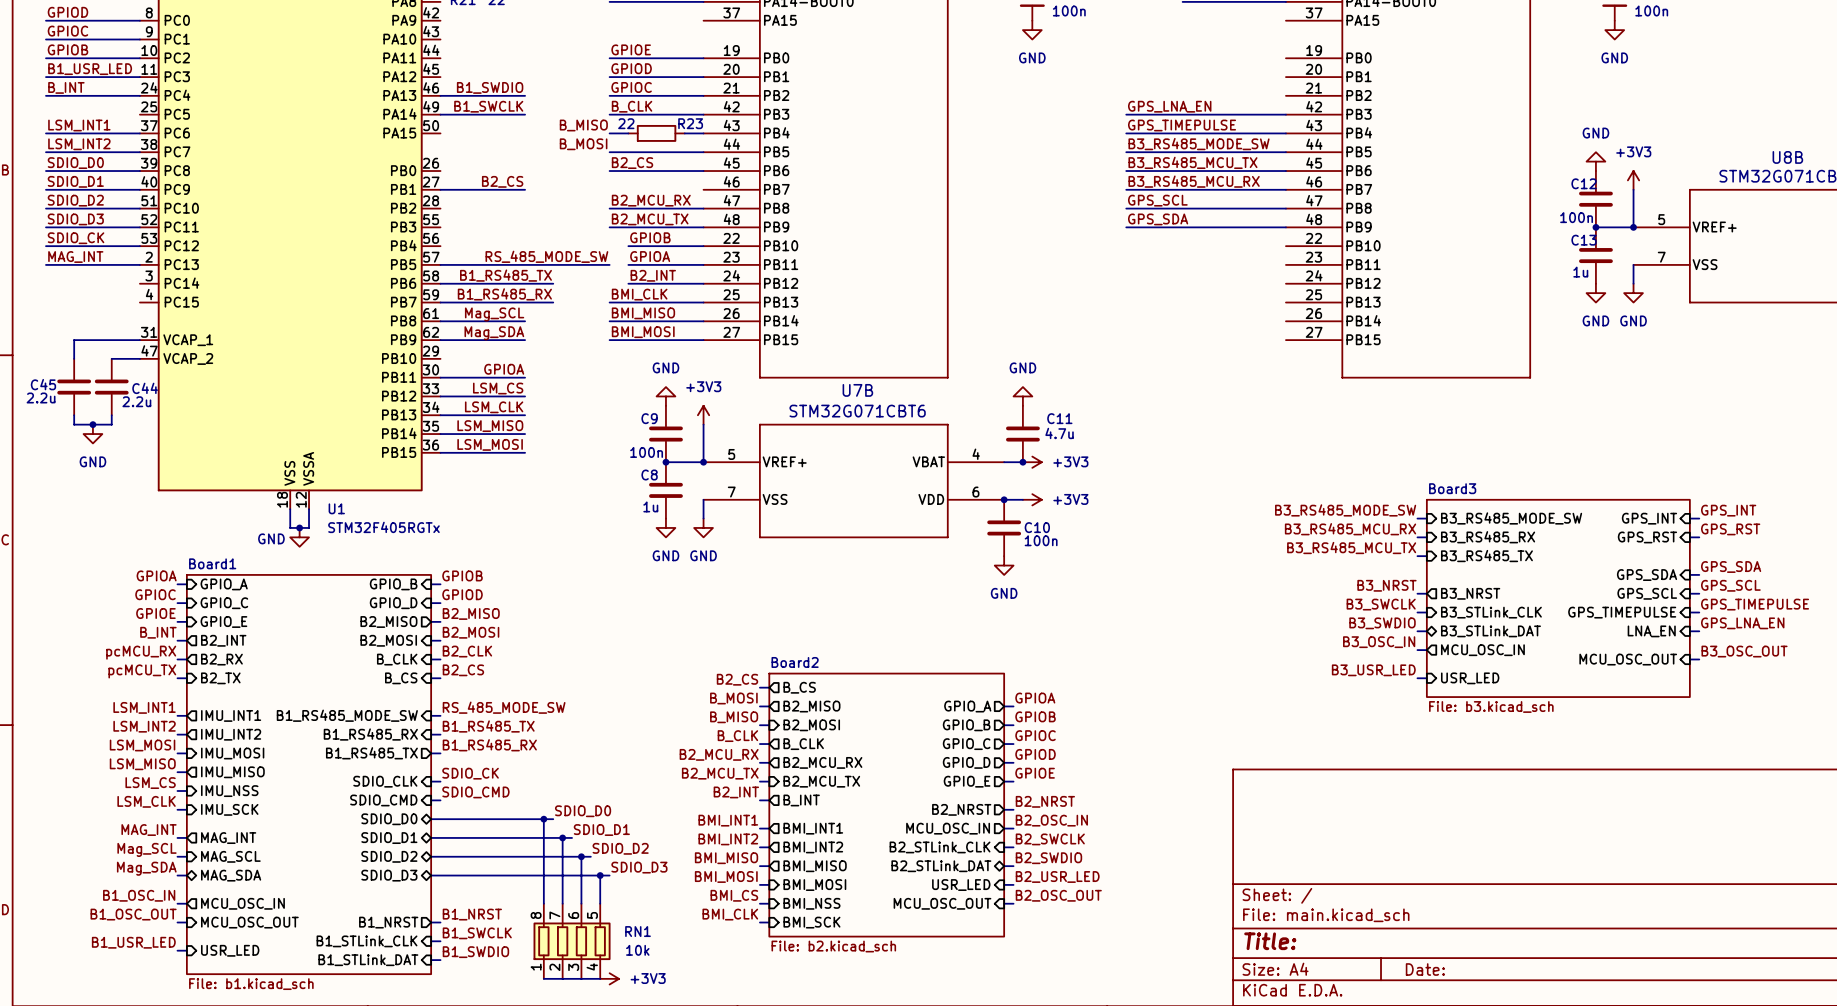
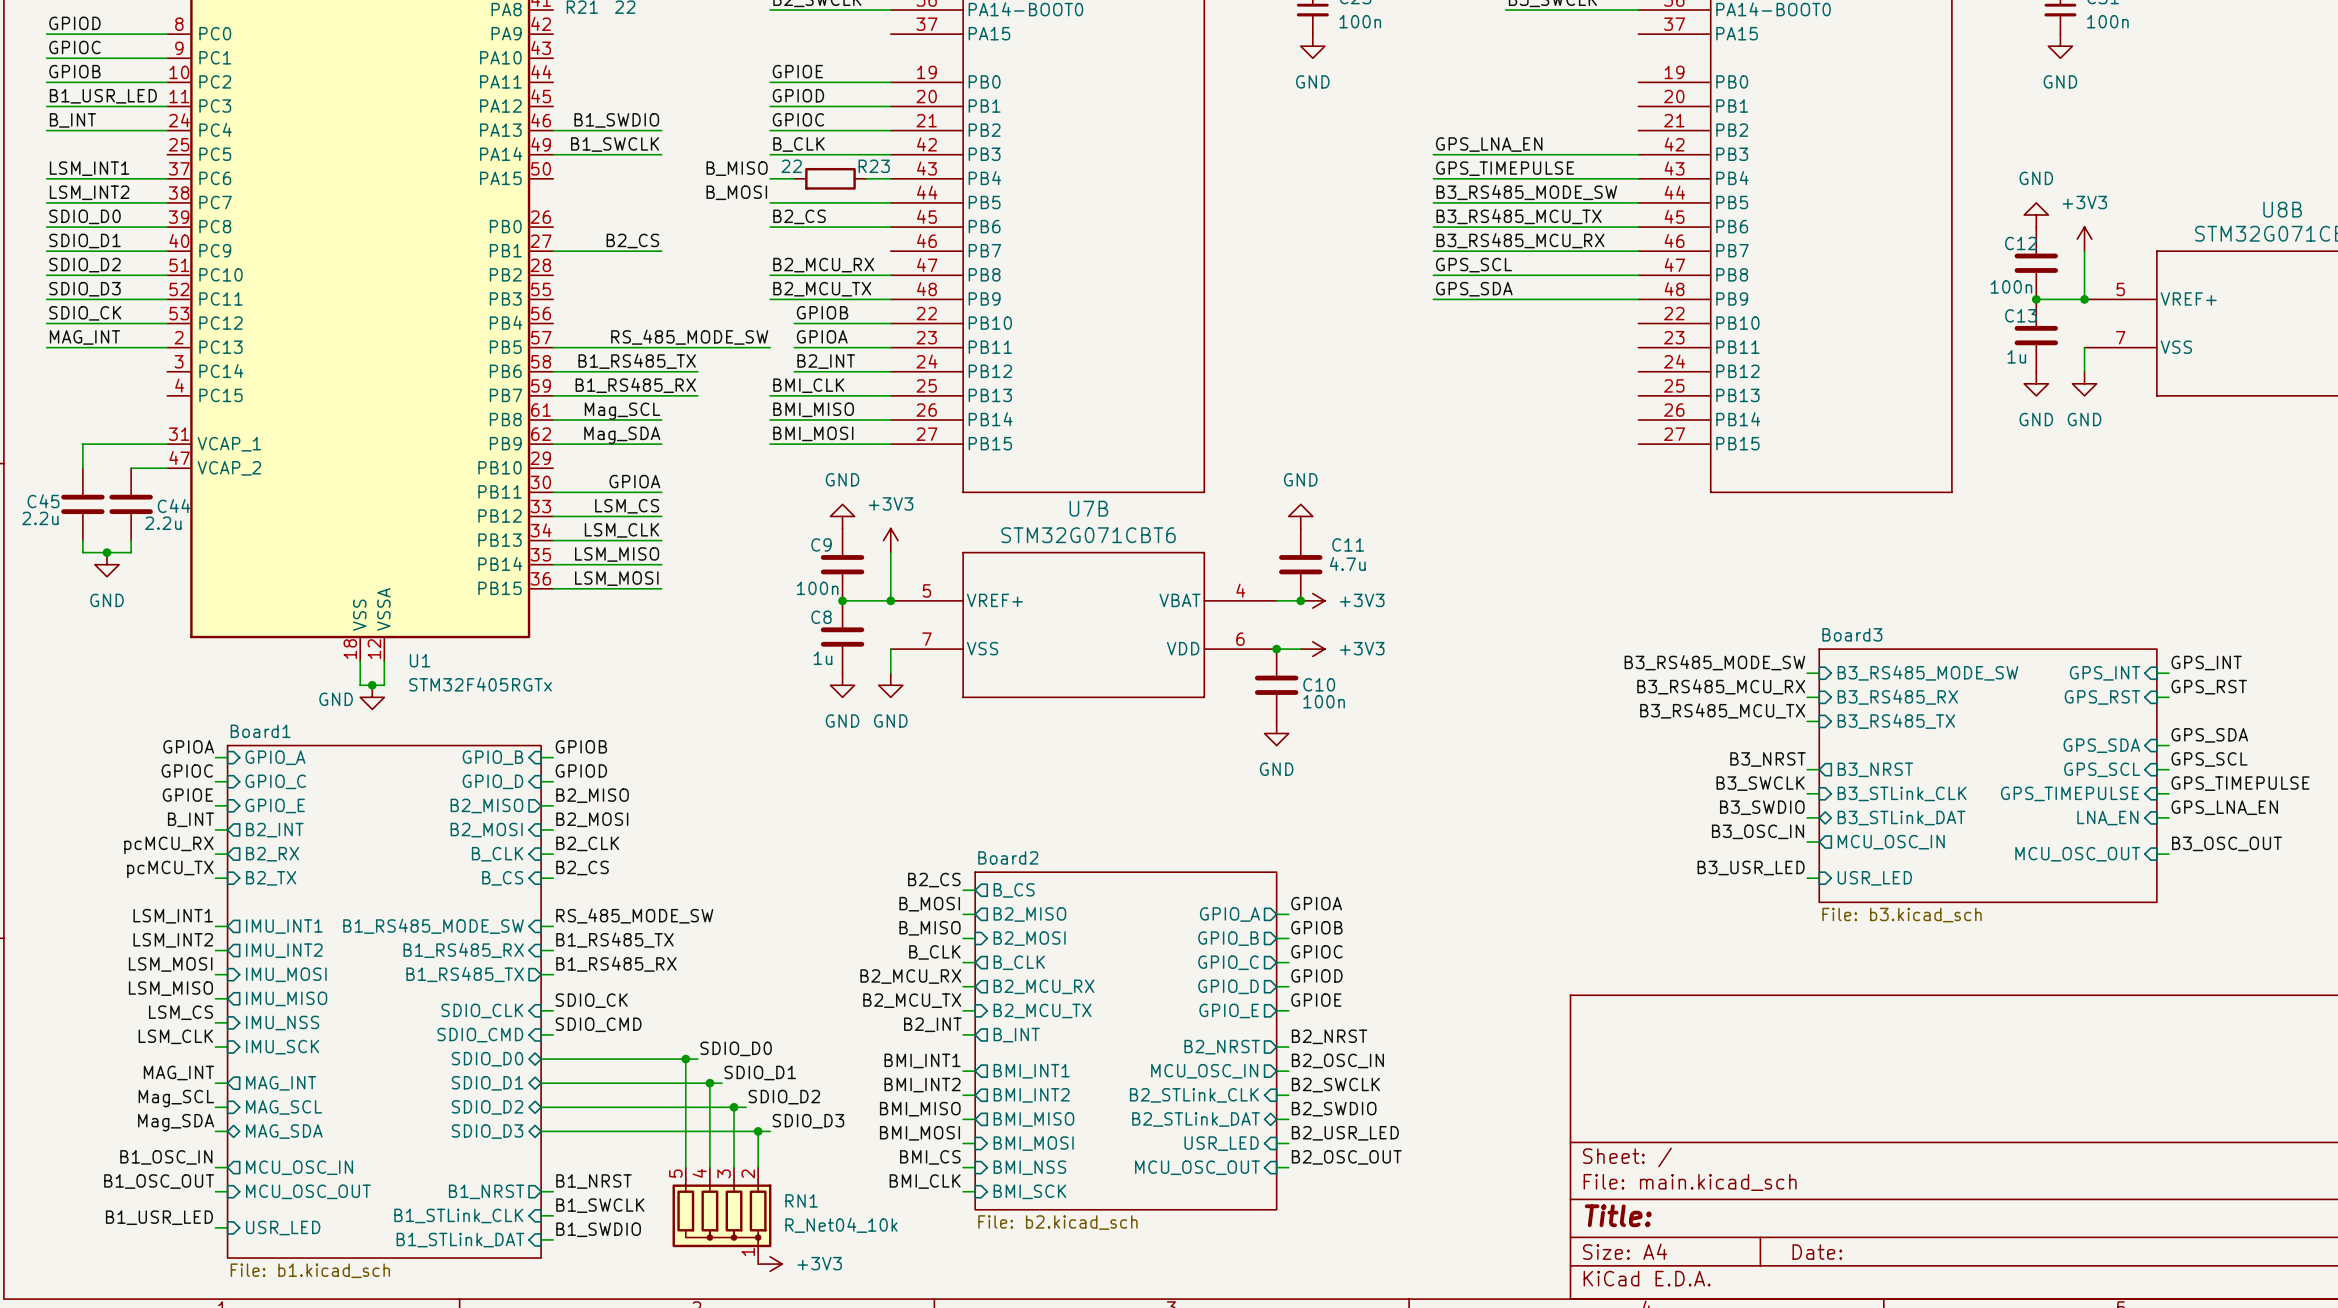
RN1 symbol: [533, 903, 611, 979] -> [672, 1167, 772, 1265]
RN1 value: 10k (637, 950) -> R_Net04_10k (841, 1225)
wire: (543, 978) (600, 978) -> none

